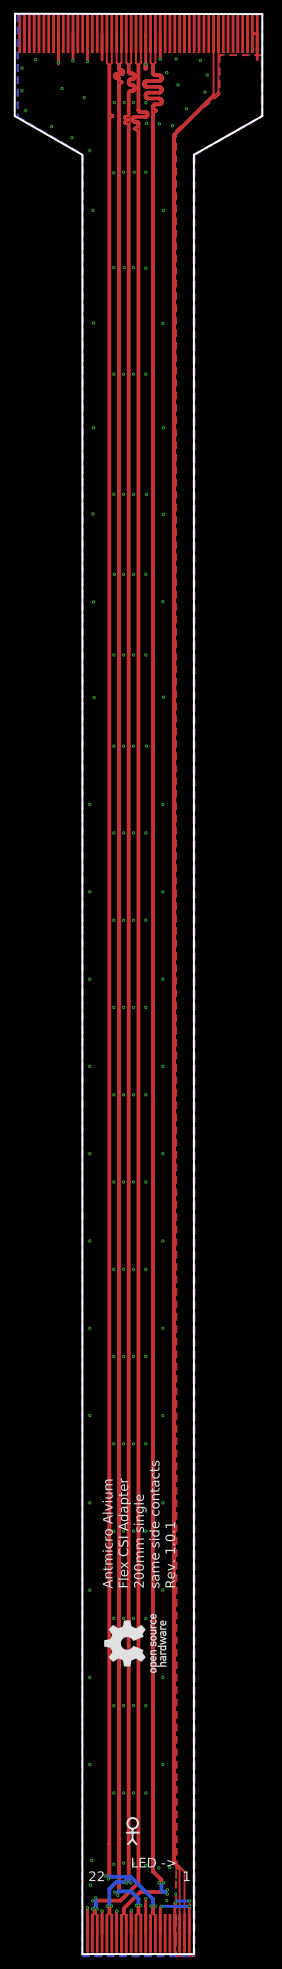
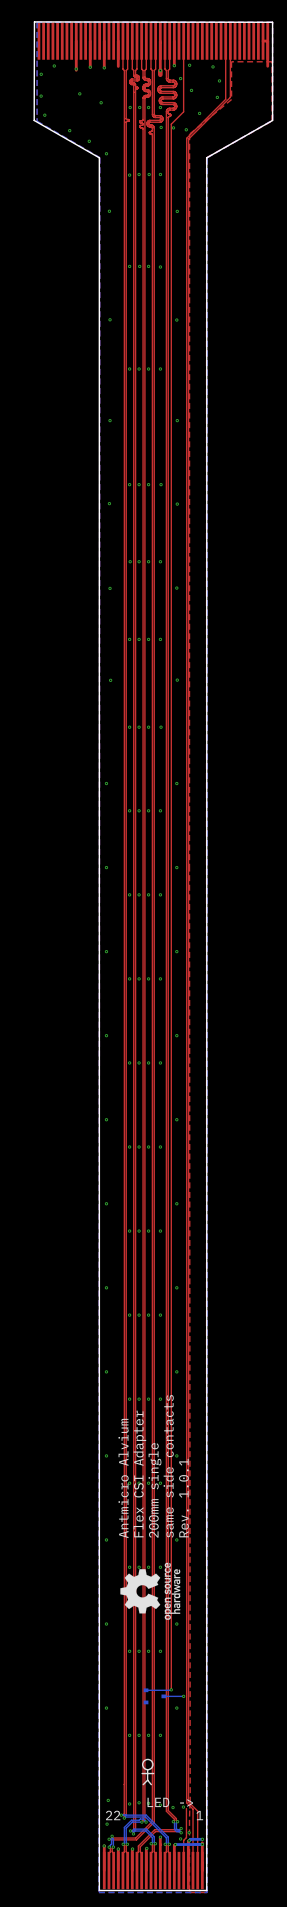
top track: none -> (183, 41) (183, 111) (171, 124) (171, 1689)
bottom track: none -> (171, 1689) (146, 1690)
via: none -> (171, 1689)
part: none -> (154, 1696)
bottom track: none -> (183, 1696) (163, 1696)
via: none -> (183, 1696)
top track: none -> (186, 1808) (183, 1870)

